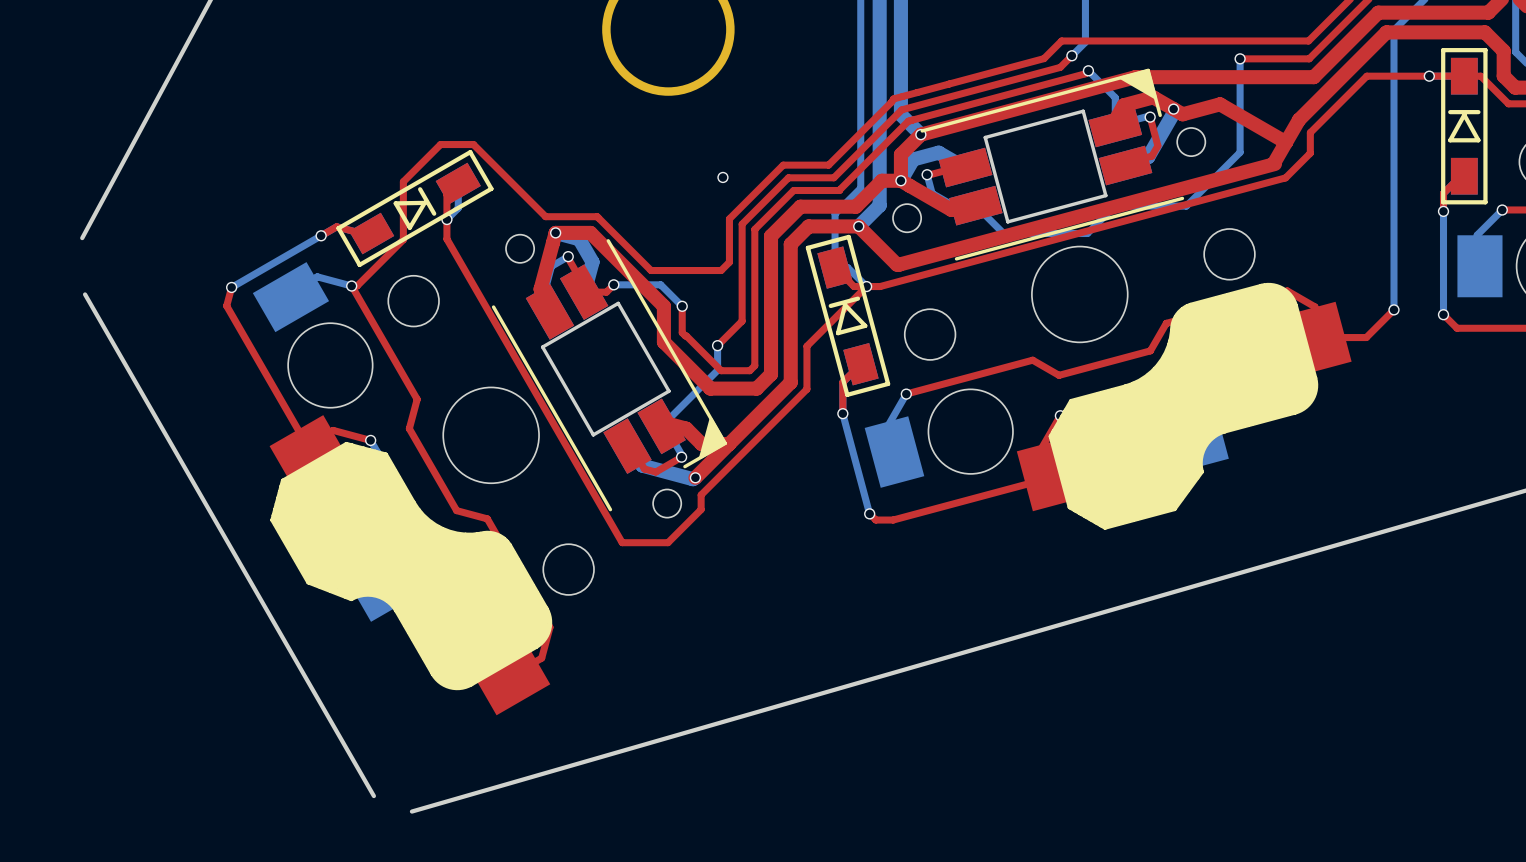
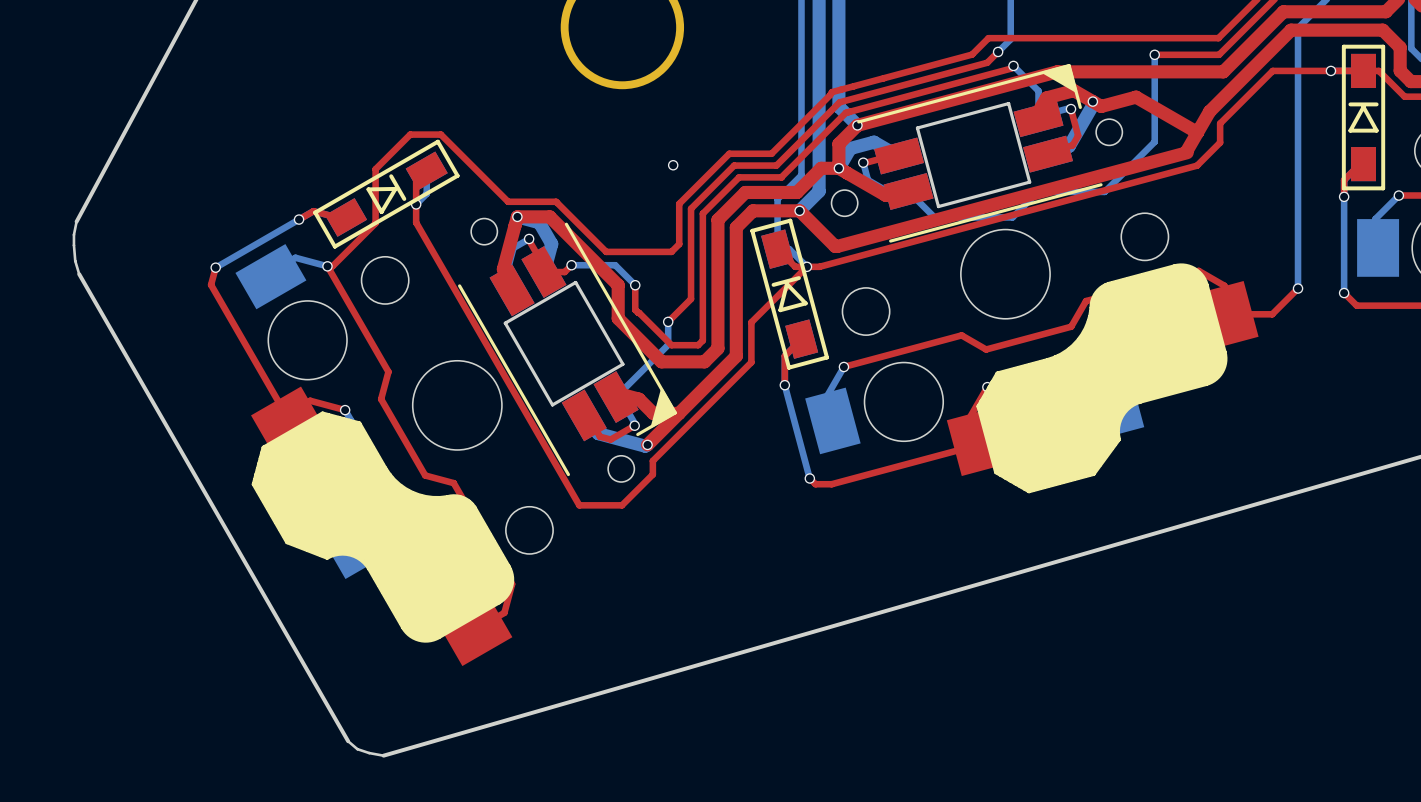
board edge: none -> (76, 221) (73, 245) (75, 261) (79, 274)
board edge: none -> (348, 741) (357, 749) (383, 755)

